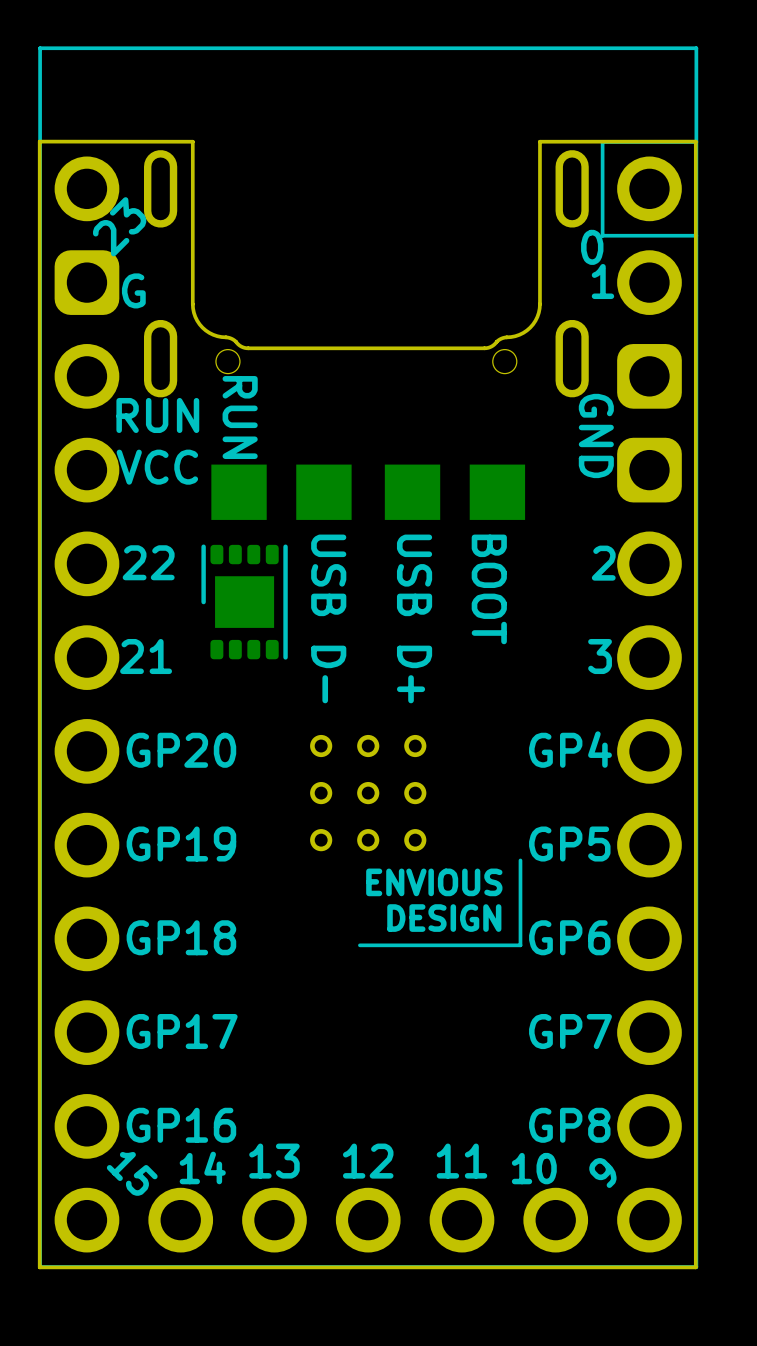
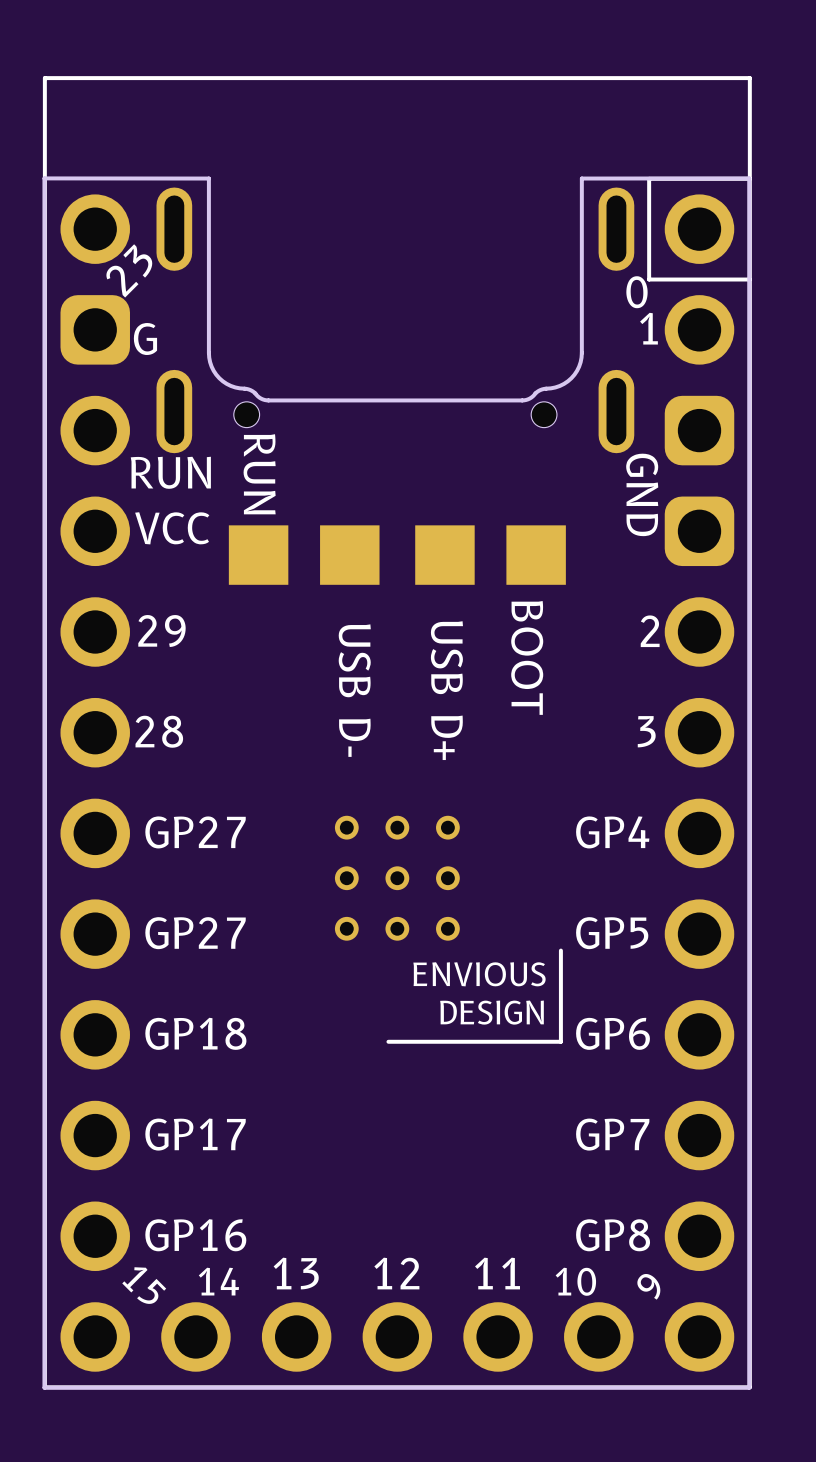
part text: 22 (148, 562) -> 29 (161, 631)
part: (244, 602) -> none
part text: 21 (146, 656) -> 28 (159, 731)
part text: GP20 (181, 750) -> GP27 (195, 832)
part text: GP19 (181, 844) -> GP27 (195, 933)

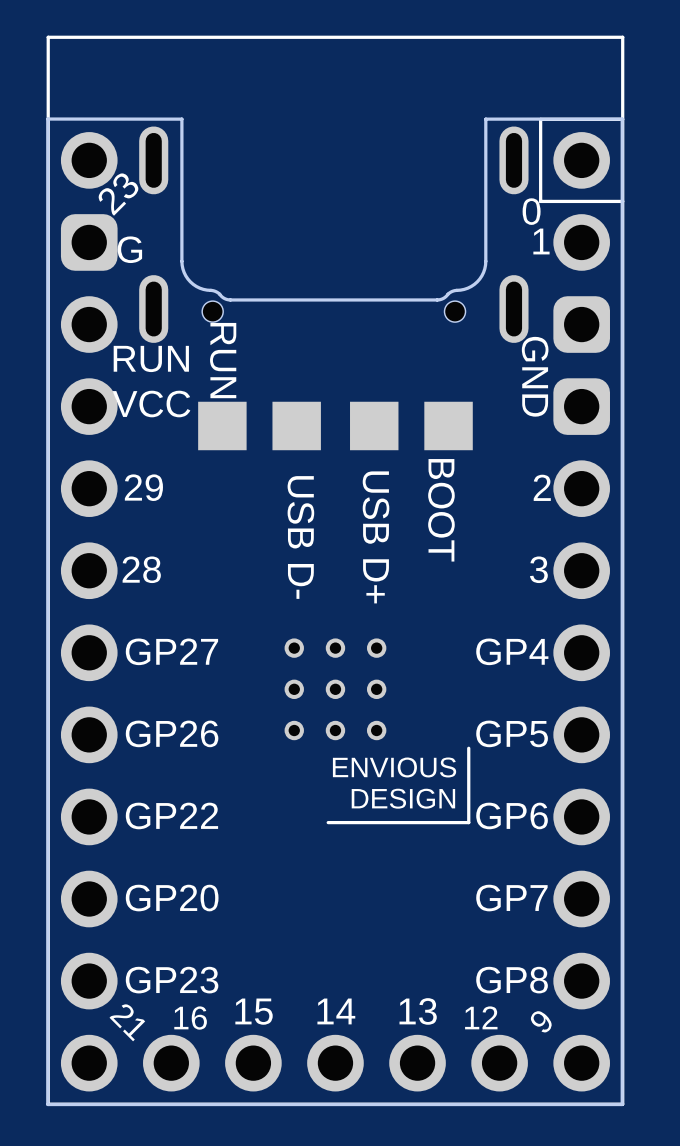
part footprint: [42, 76, 752, 1390] -> [46, 35, 625, 1106]

